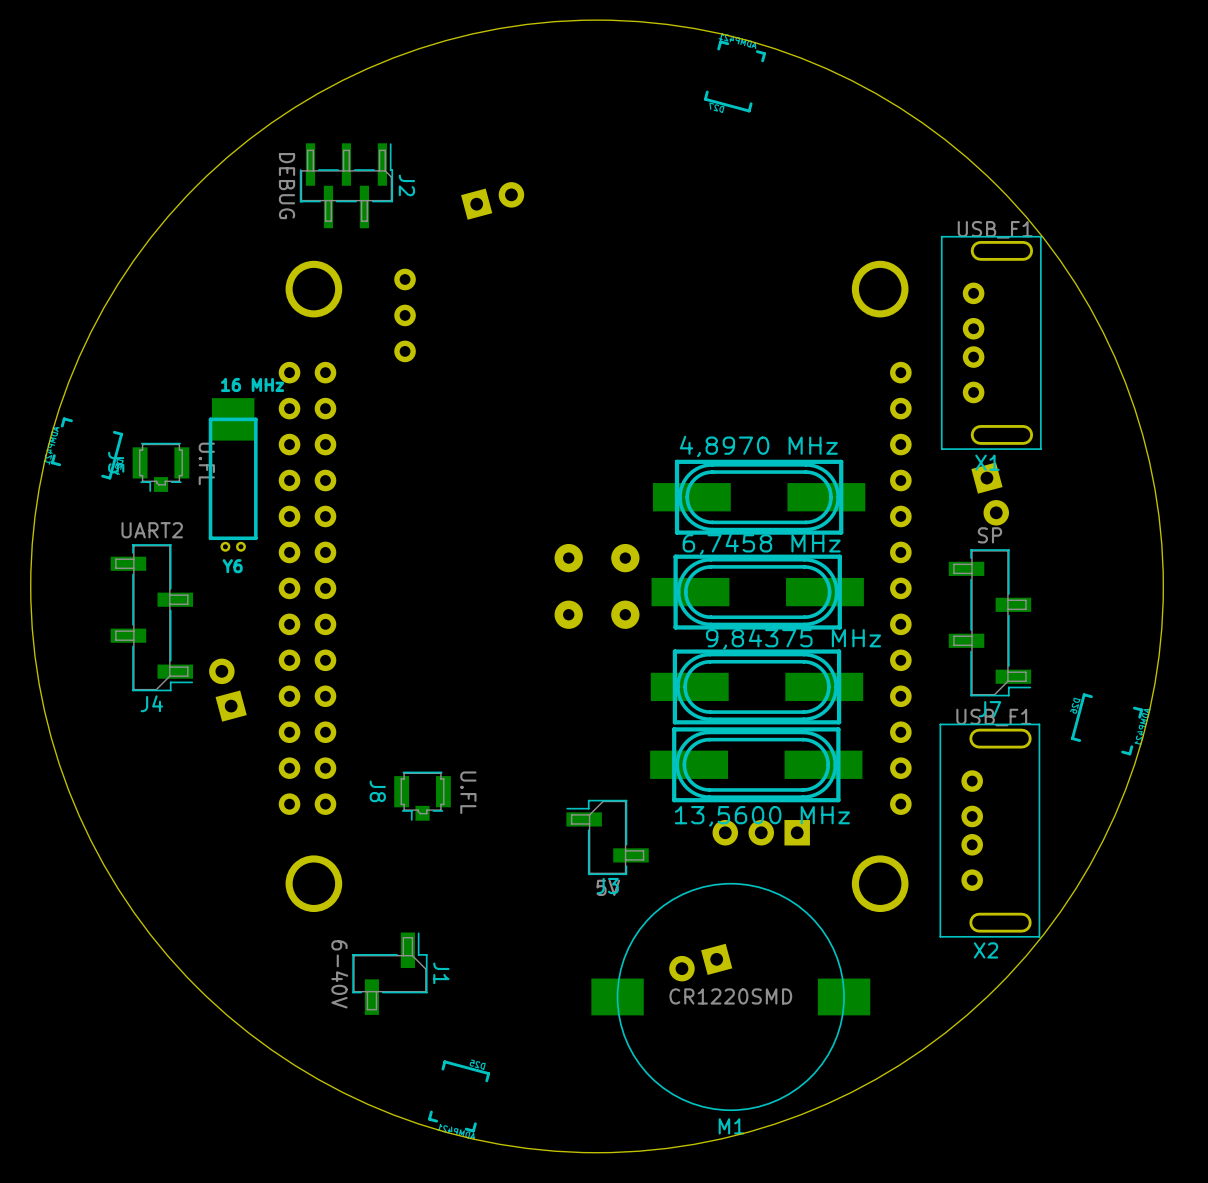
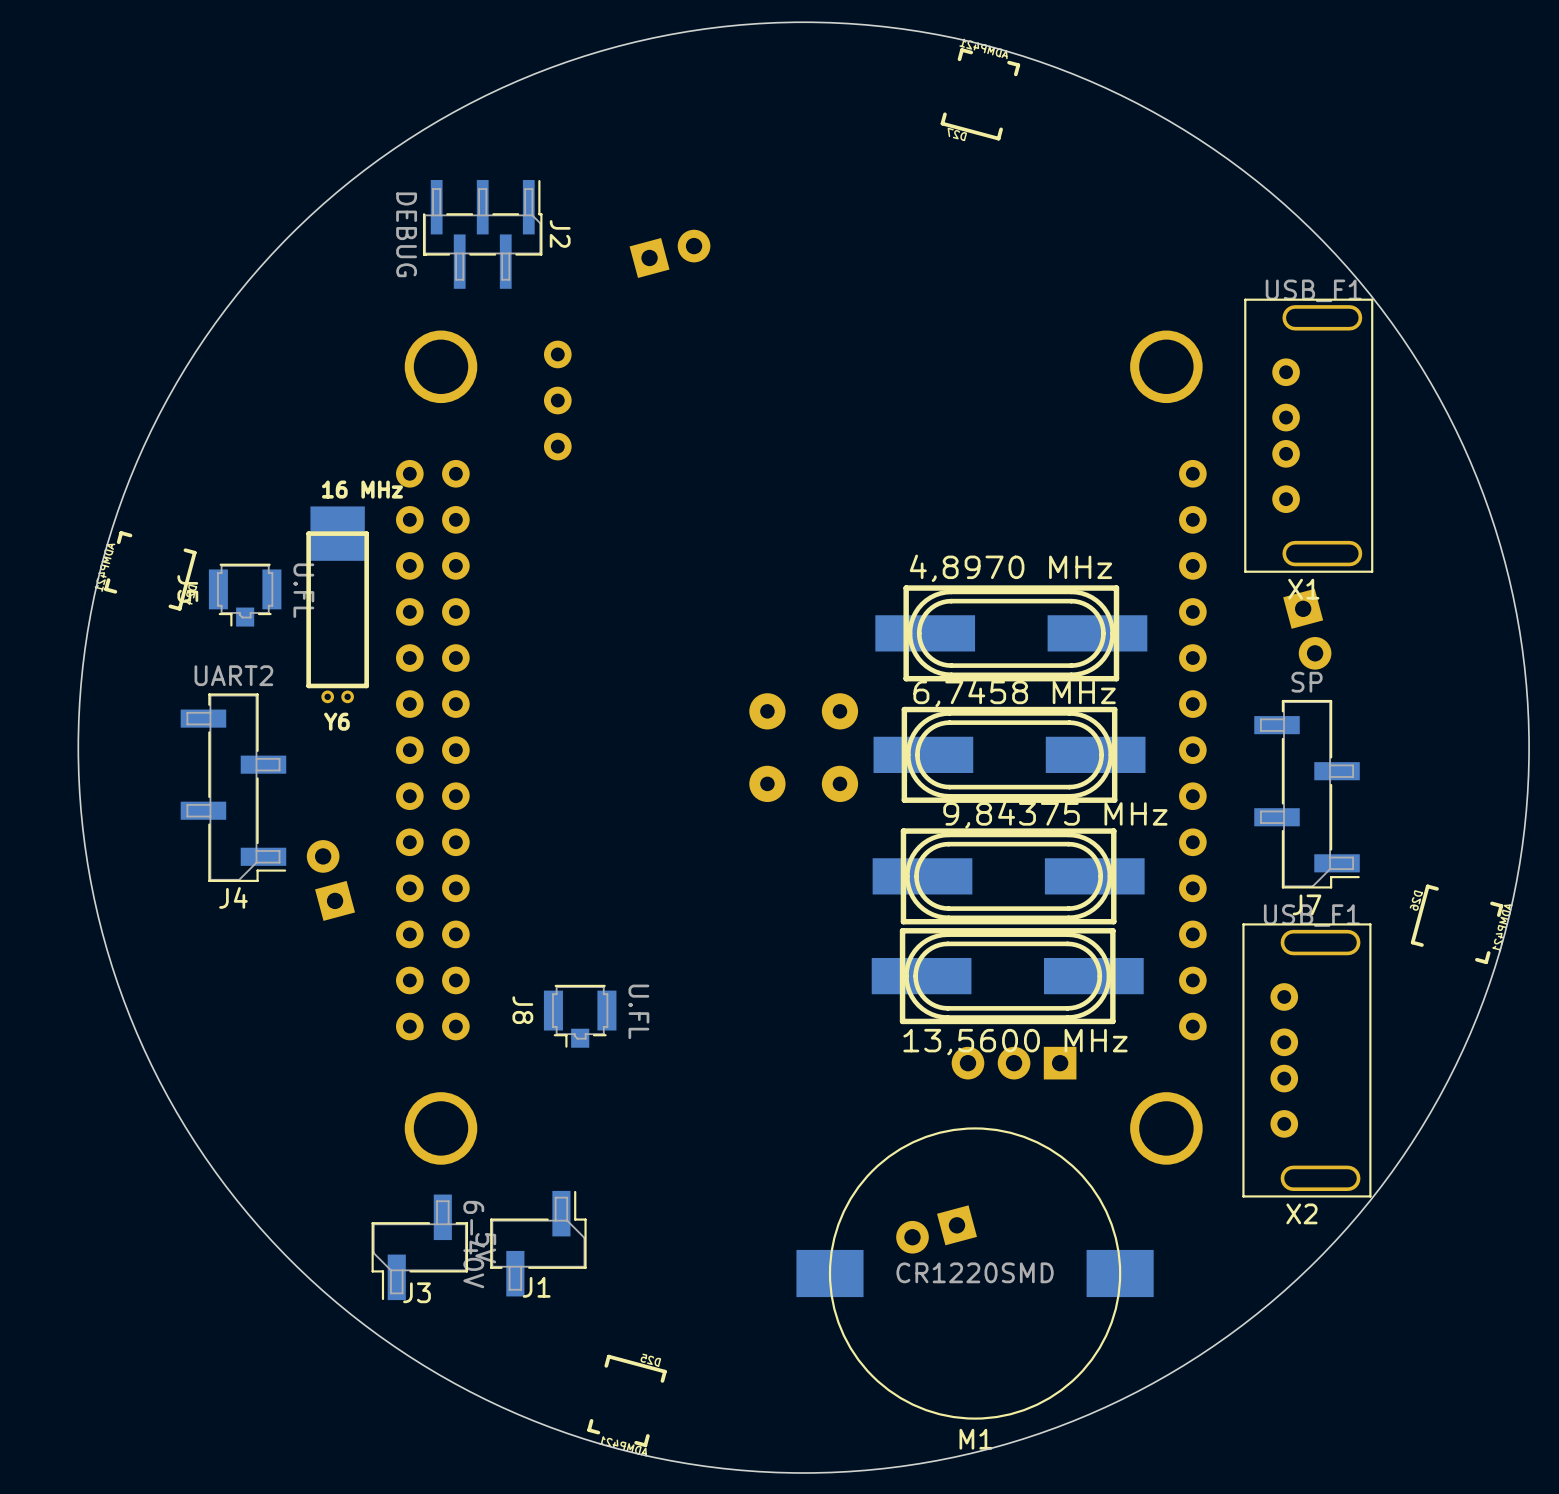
J3 rotation: 0° (607, 837) -> 90° counterclockwise (419, 1247)
J3 position: (607, 837) -> (419, 1247)
J1 name rotation: 0° (441, 973) -> 90° counterclockwise (536, 1287)
J1 name position: J1 (441, 973) -> J1 (536, 1287)

